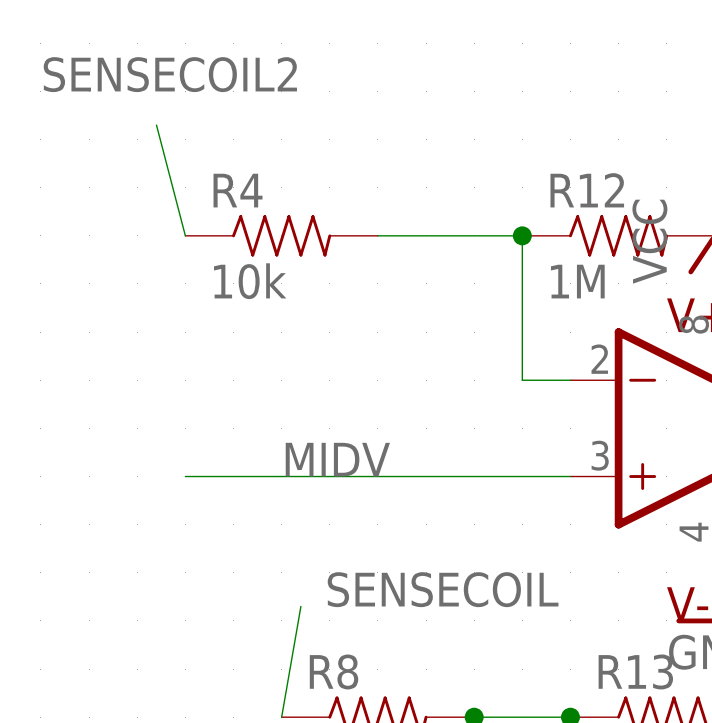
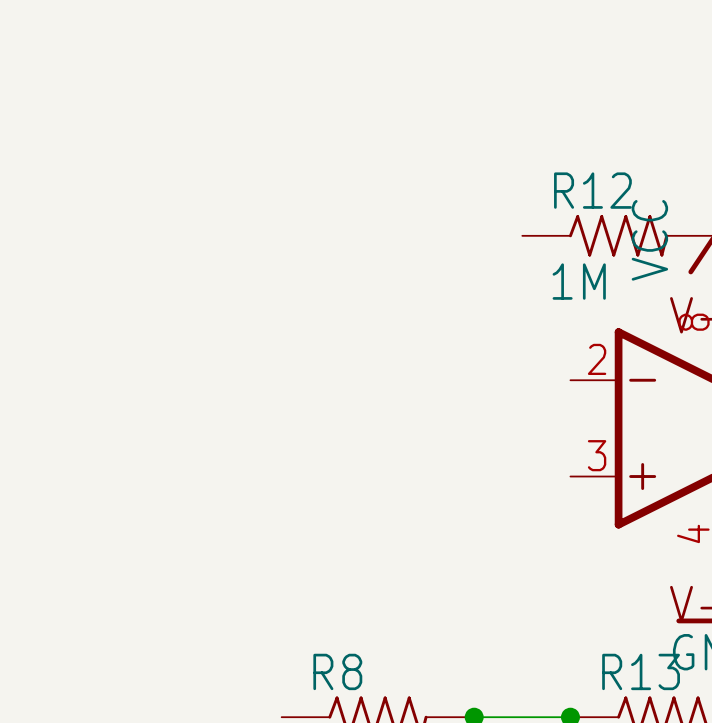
label: SENSECOIL2 (170, 74) -> none
wire: (156, 125) (185, 235) -> none
R4: 10k (281, 235) -> none
wire: (377, 235) (522, 235) (522, 380) (570, 380) -> none
junction: (522, 235) -> none
label: MIDV (337, 459) -> none
wire: (185, 476) (570, 476) -> none
label: SENSECOIL (443, 589) -> none
wire: (300, 606) (281, 717) -> none

